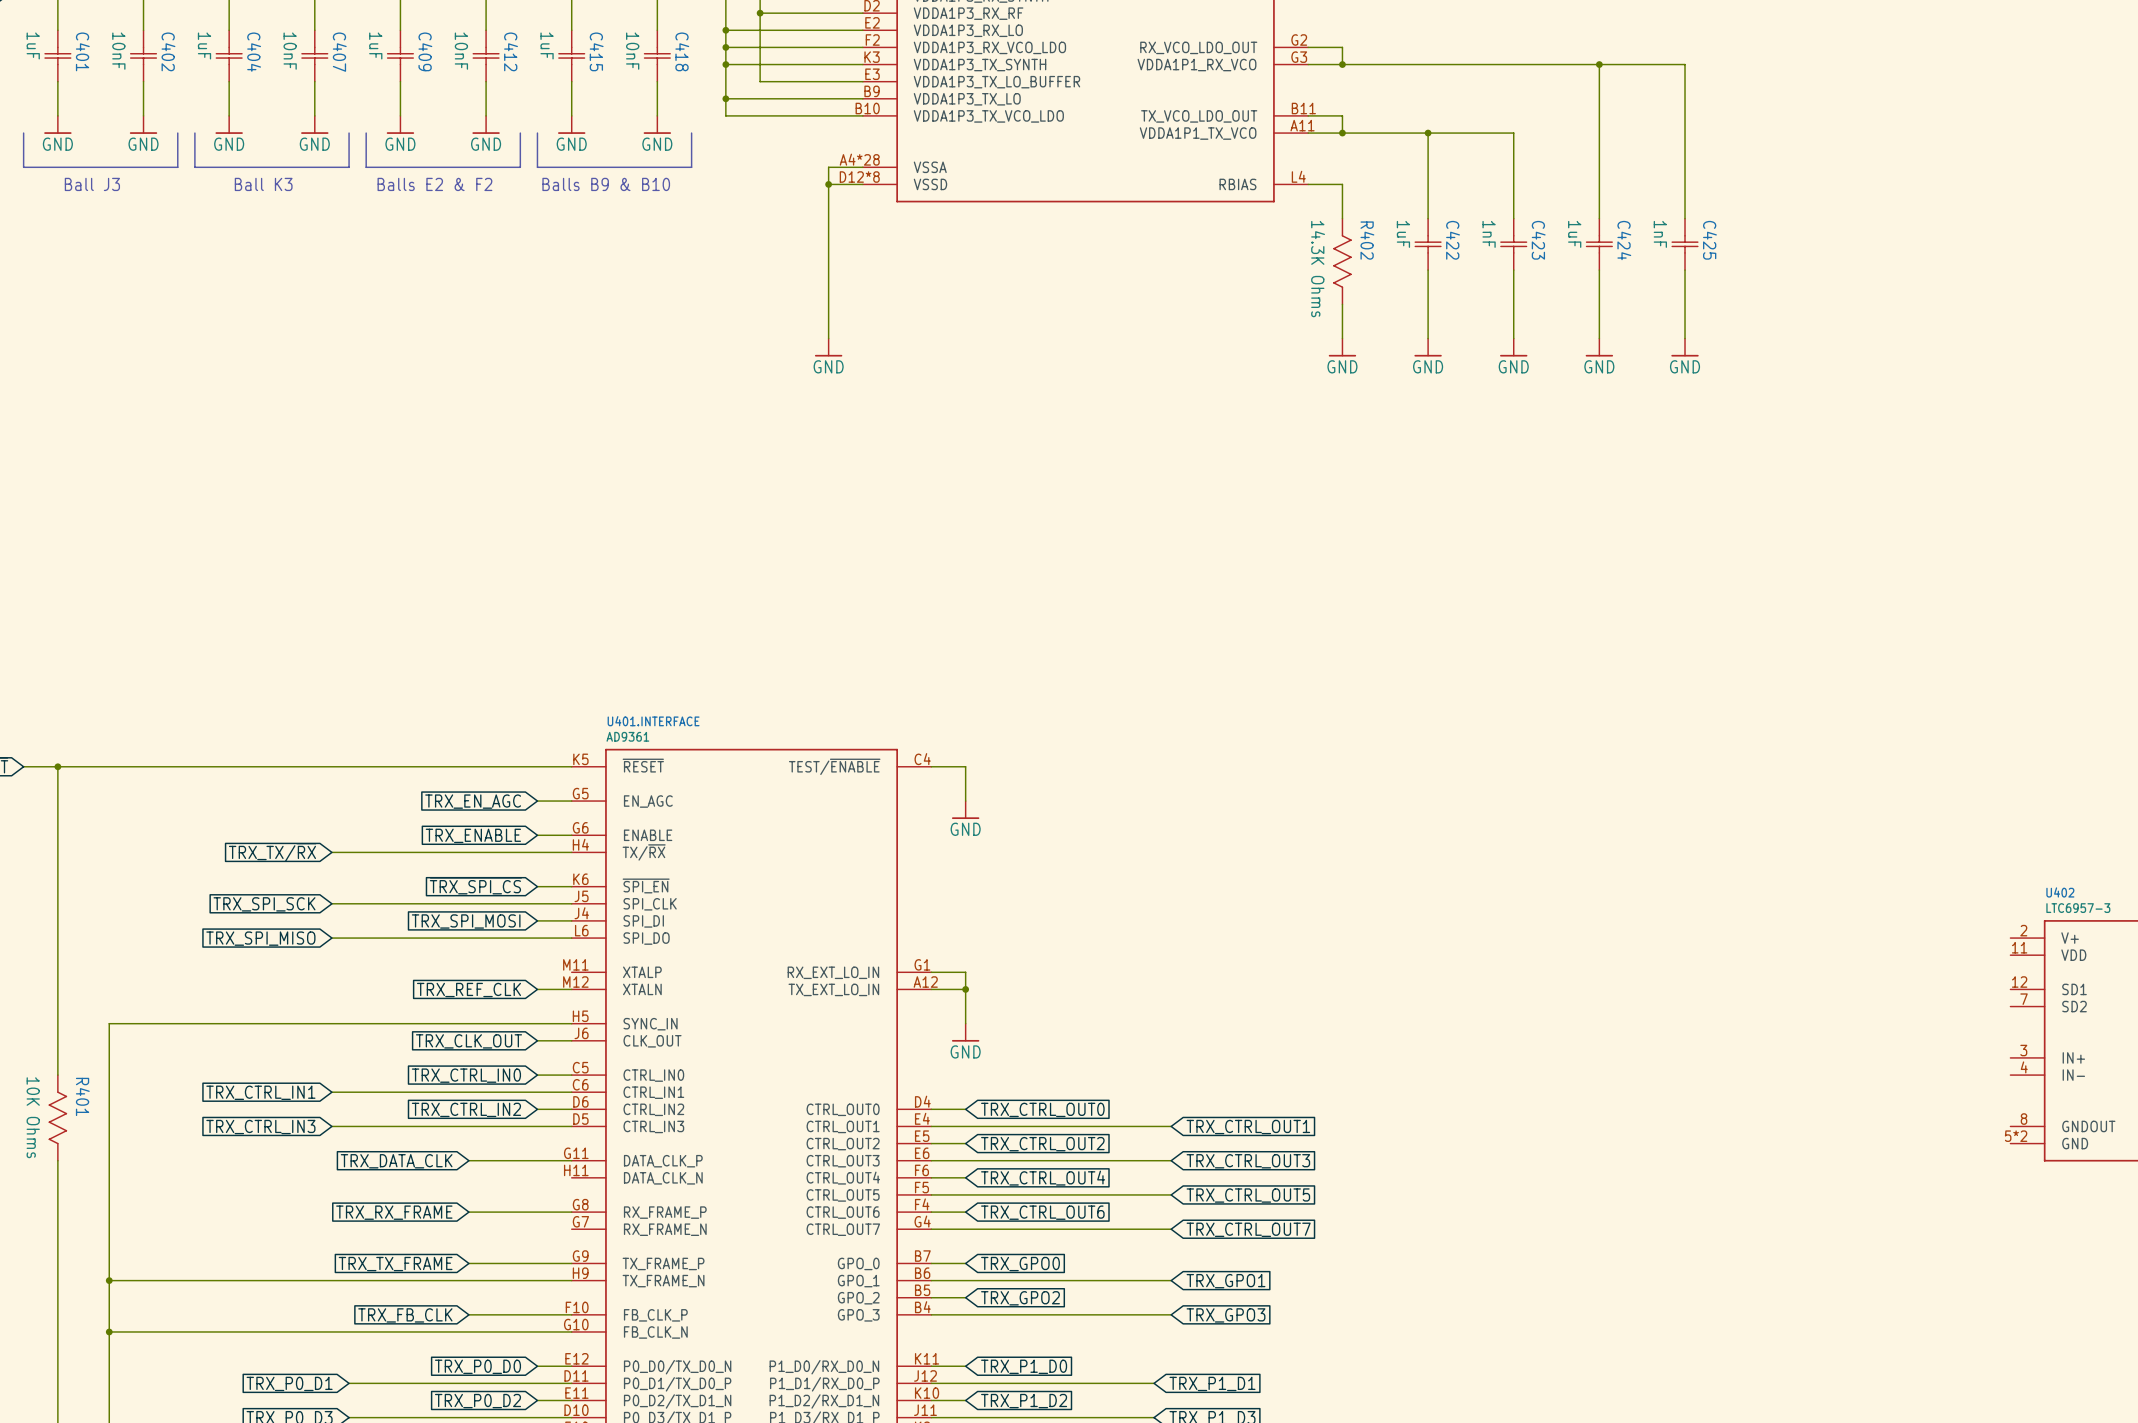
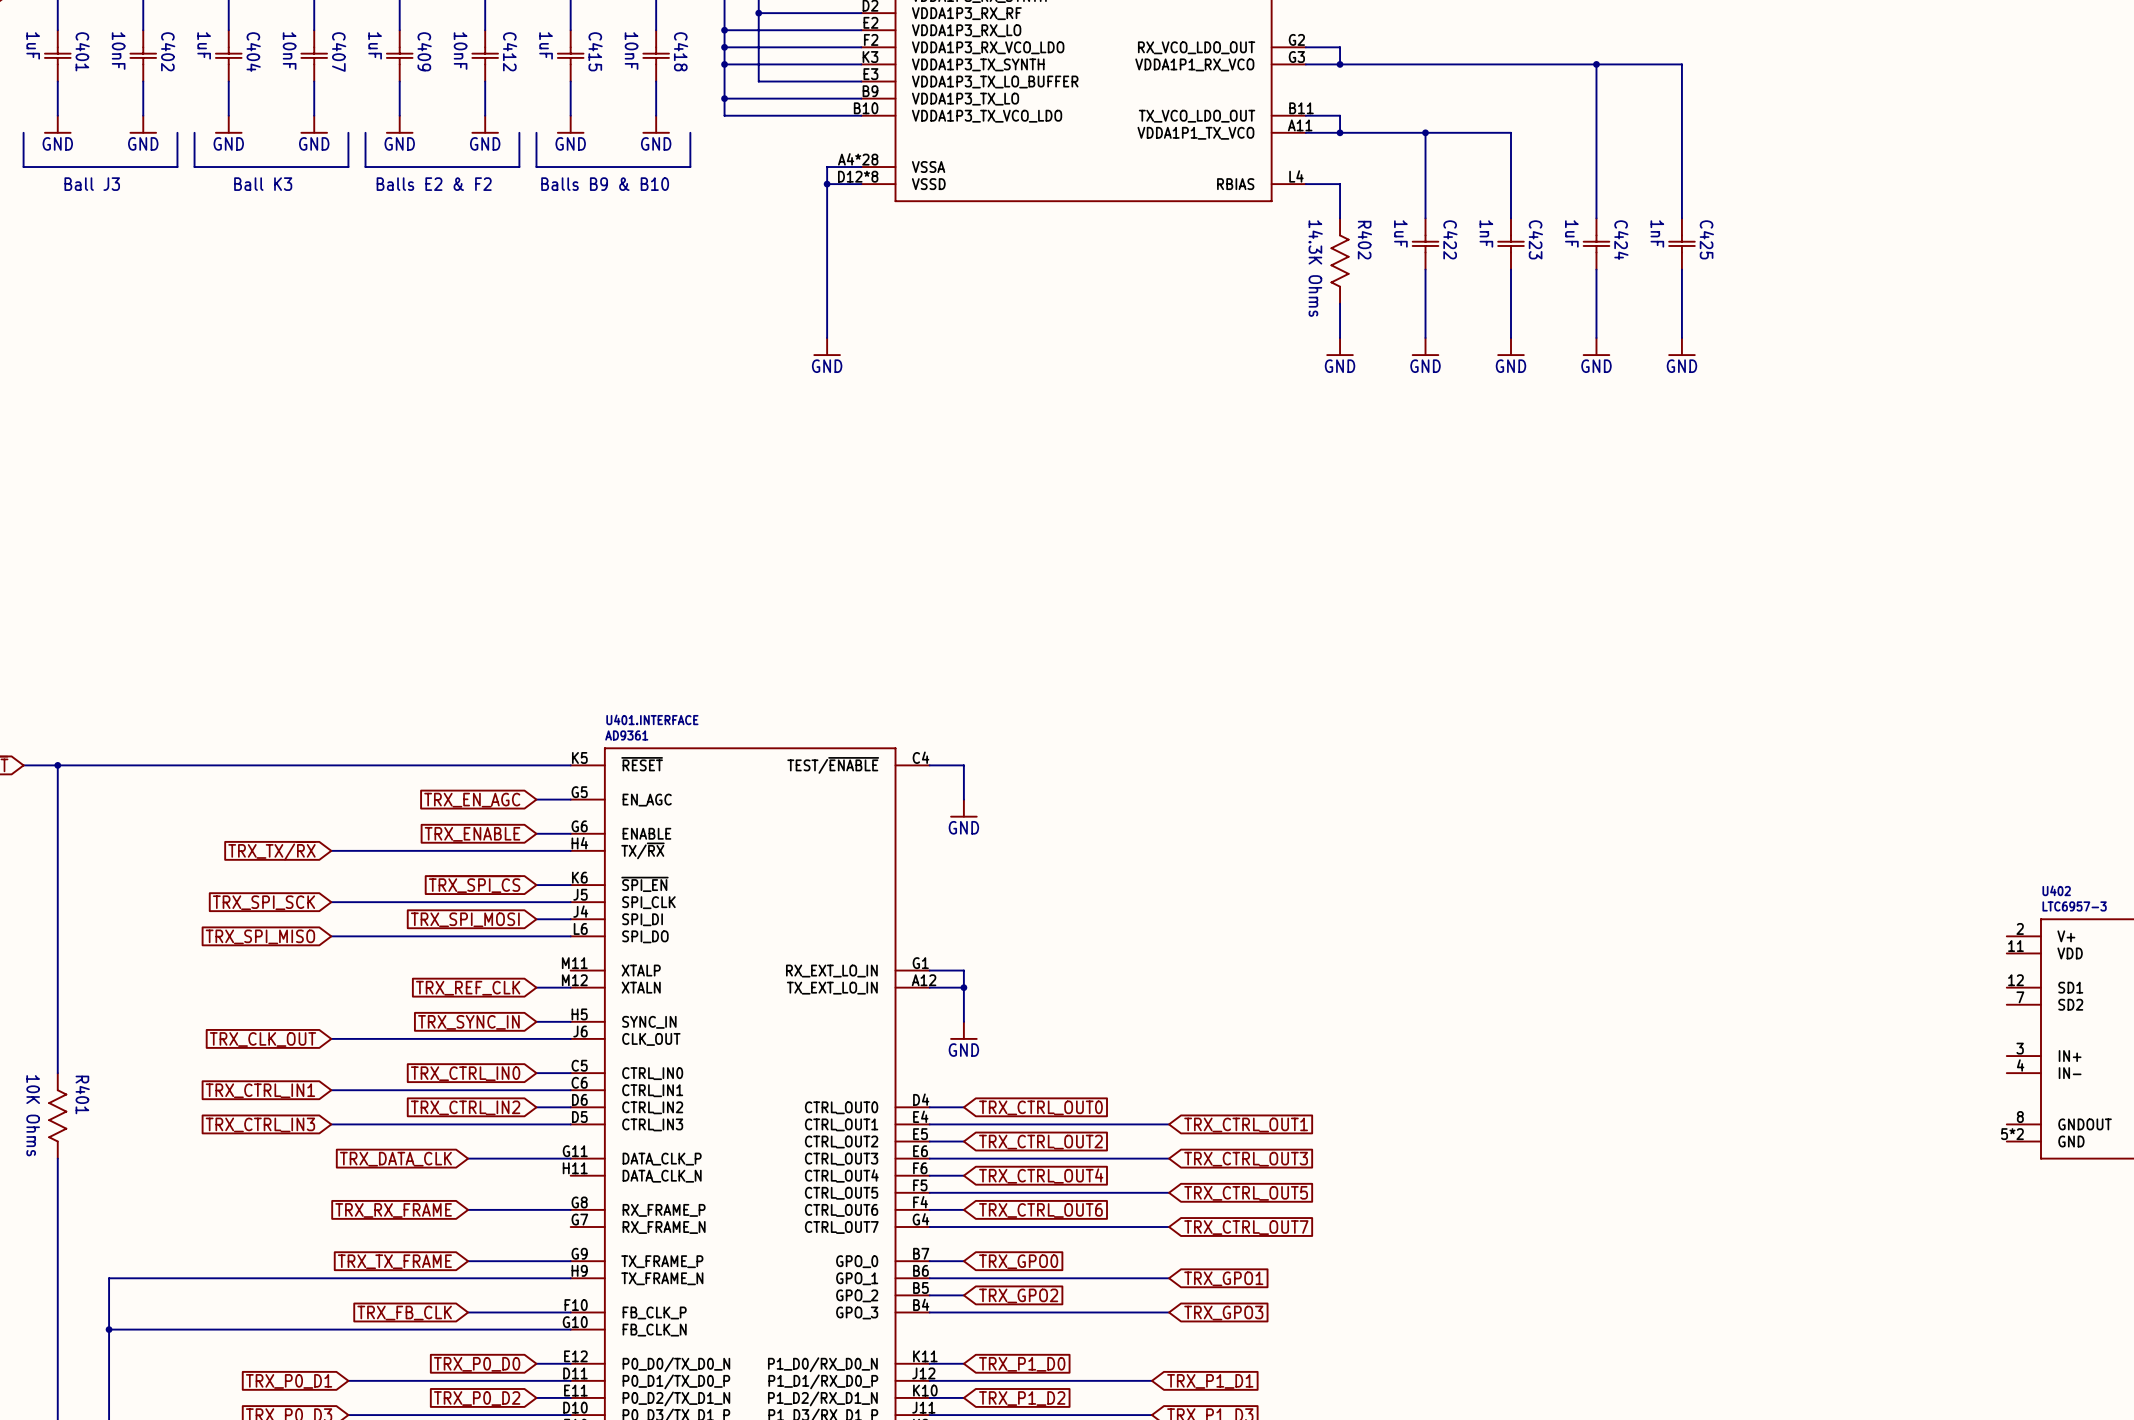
wire: (537, 1023) (109, 1023) (109, 1280) -> none
global label: none -> TRX_SYNC_IN (468, 1022)
wire: none -> (331, 1038) (536, 1038)
global label: none -> TRX_CLK_OUT (262, 1039)
global label: TRX_CLK_OUT (469, 1041) -> none
junction: (109, 1280) -> none

